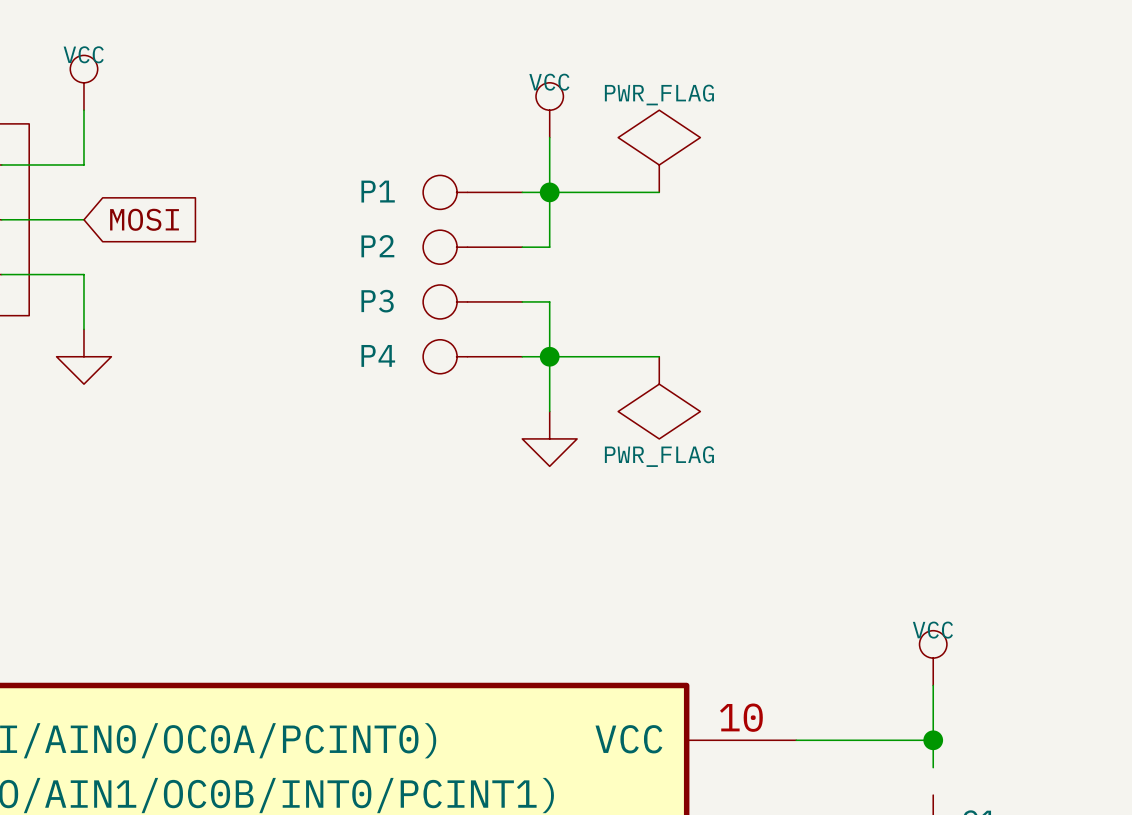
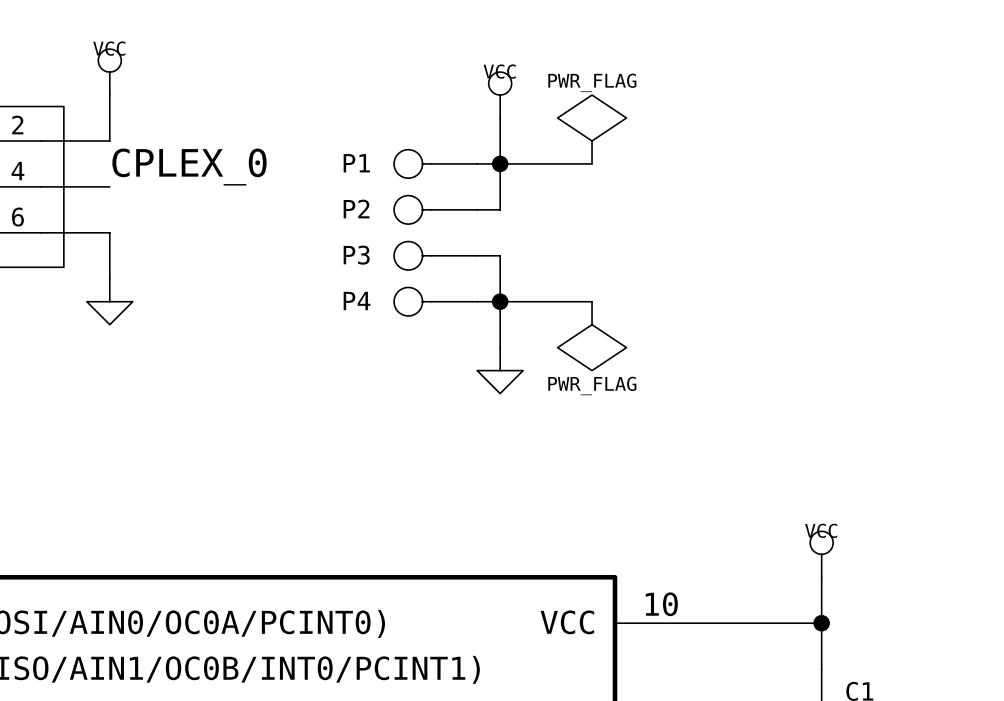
label: none -> CPLEX_0 (189, 167)
global label: MOSI (144, 219) -> none
wire: none -> (821, 646) (821, 669)

